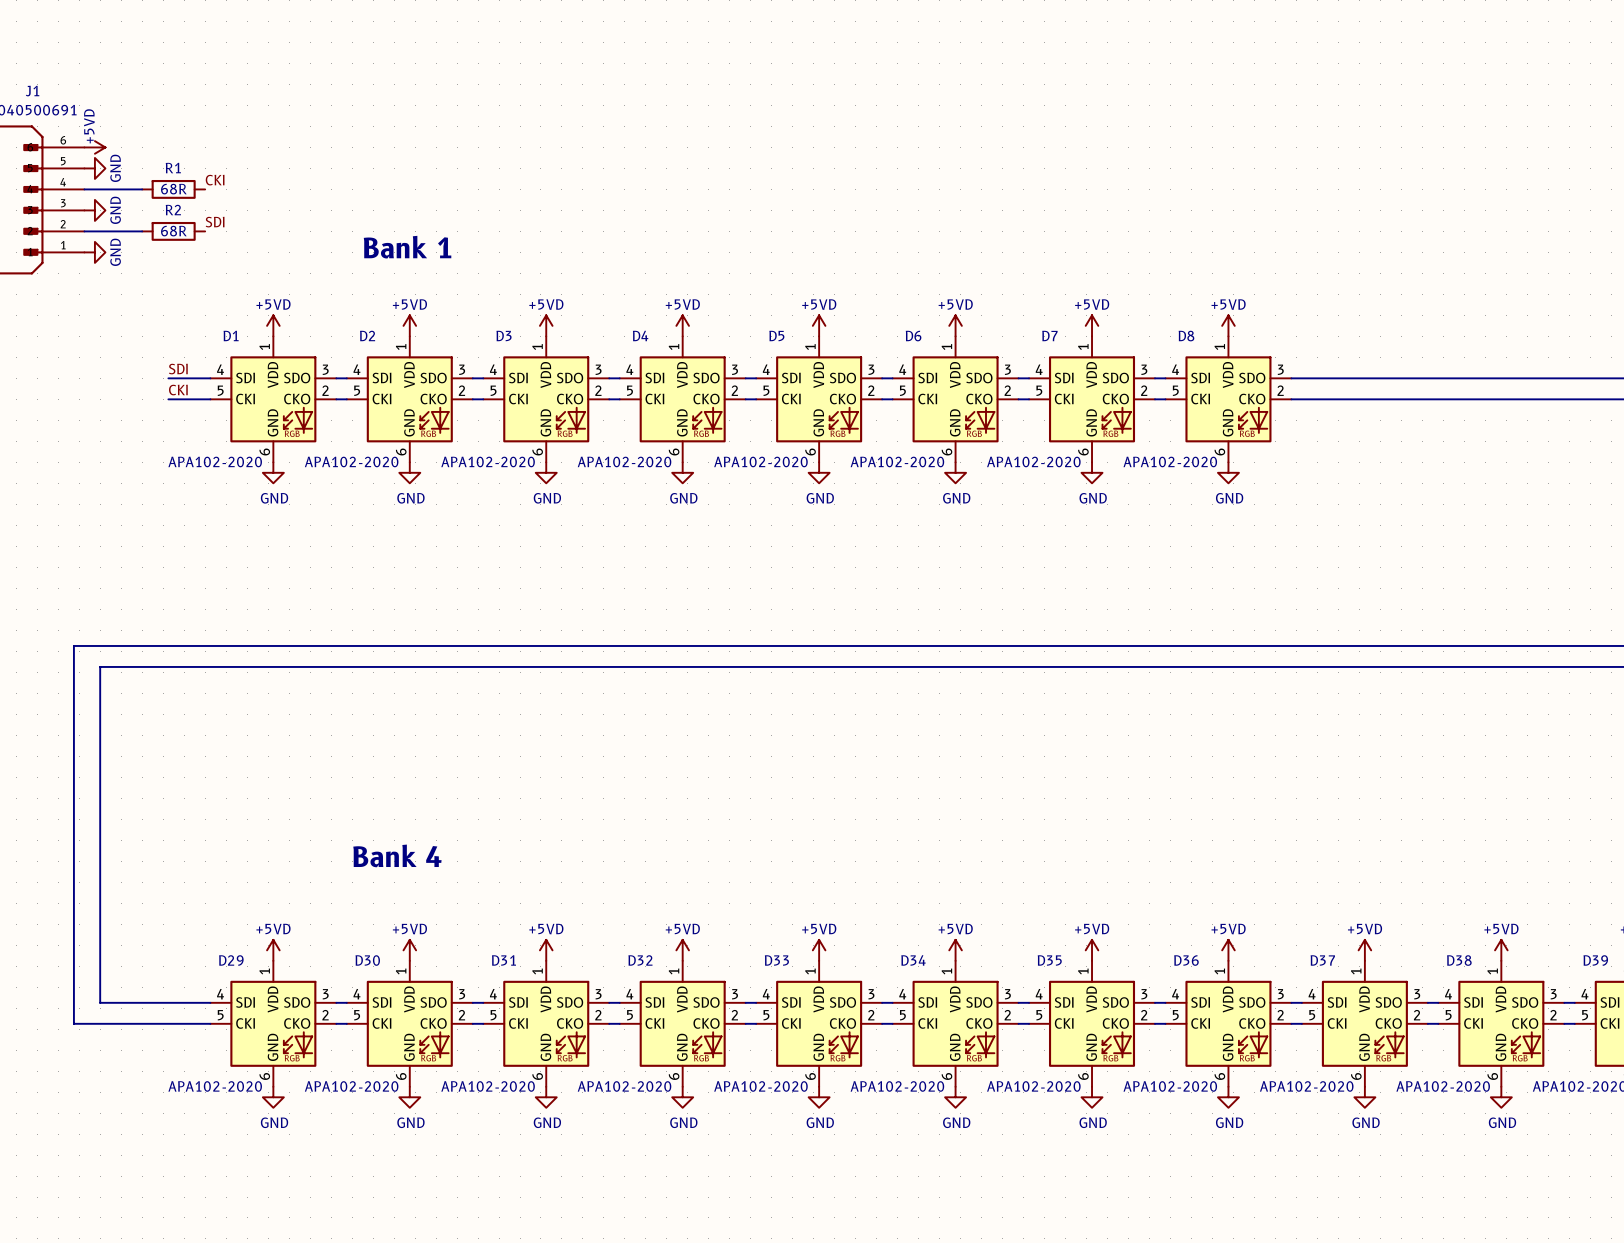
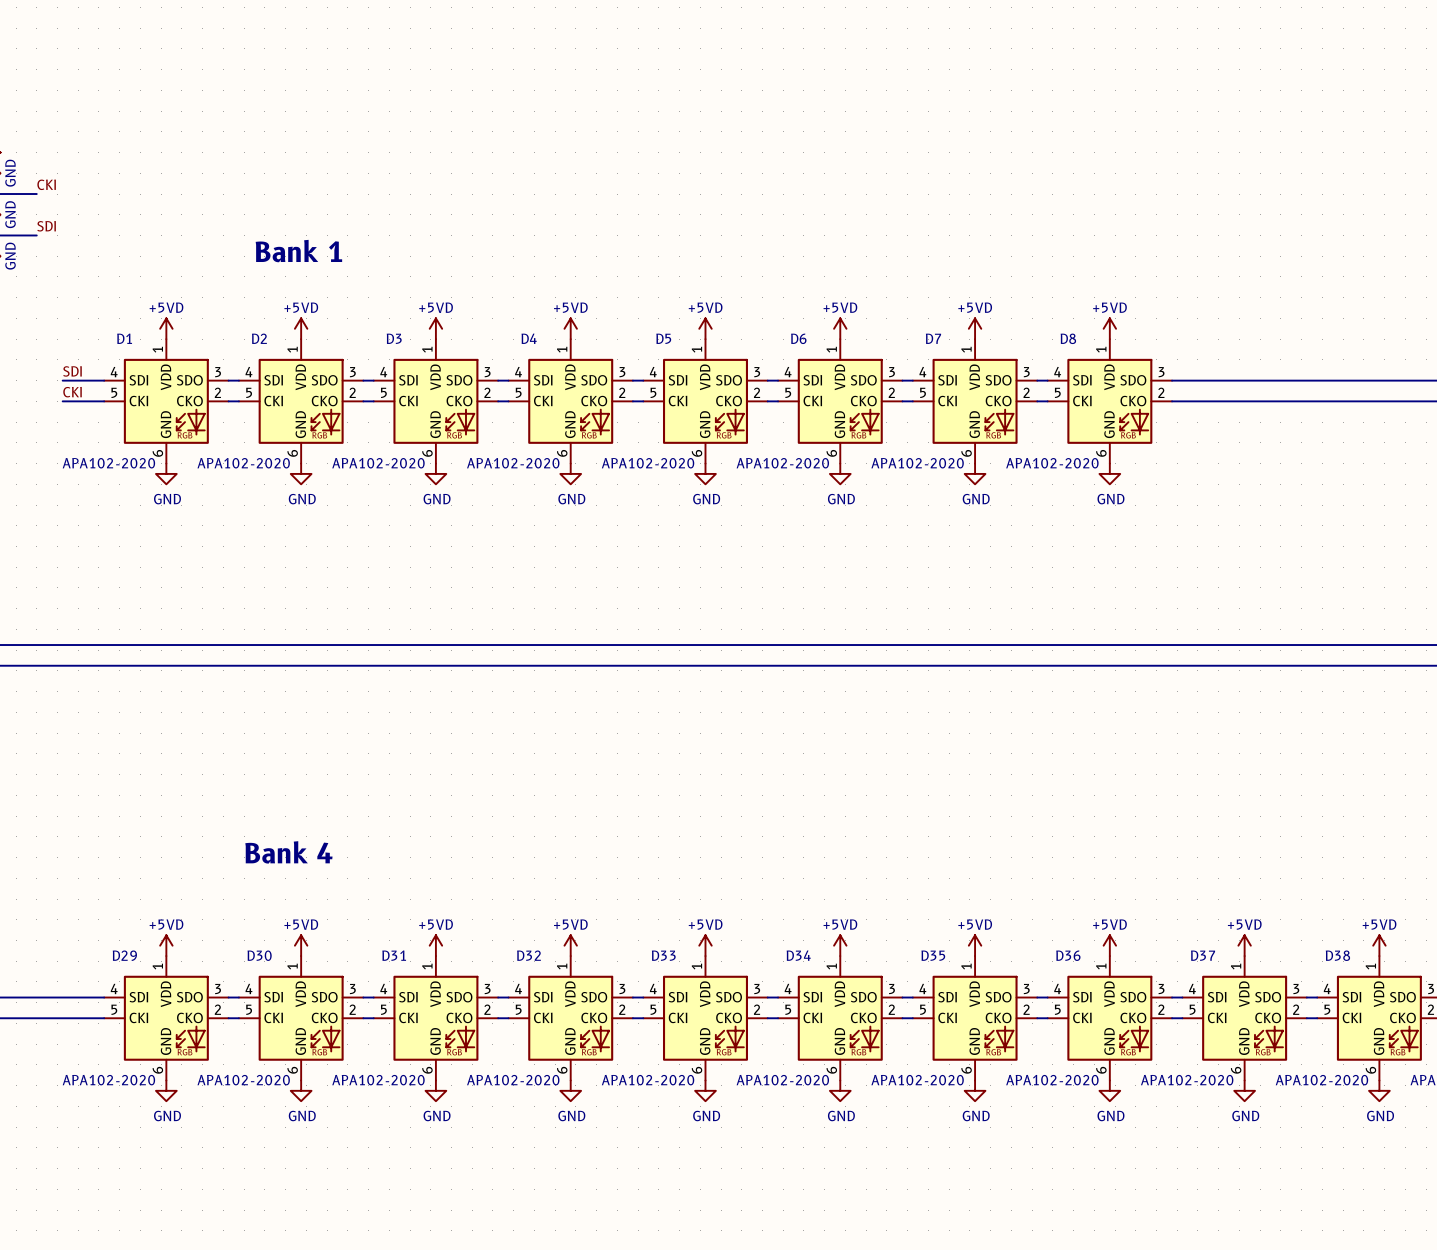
label position: CKI (215, 180) -> CKI (46, 184)
R1: 68R (173, 189) -> none
label position: SDI (215, 222) -> SDI (46, 226)
R2: 68R (173, 231) -> none

